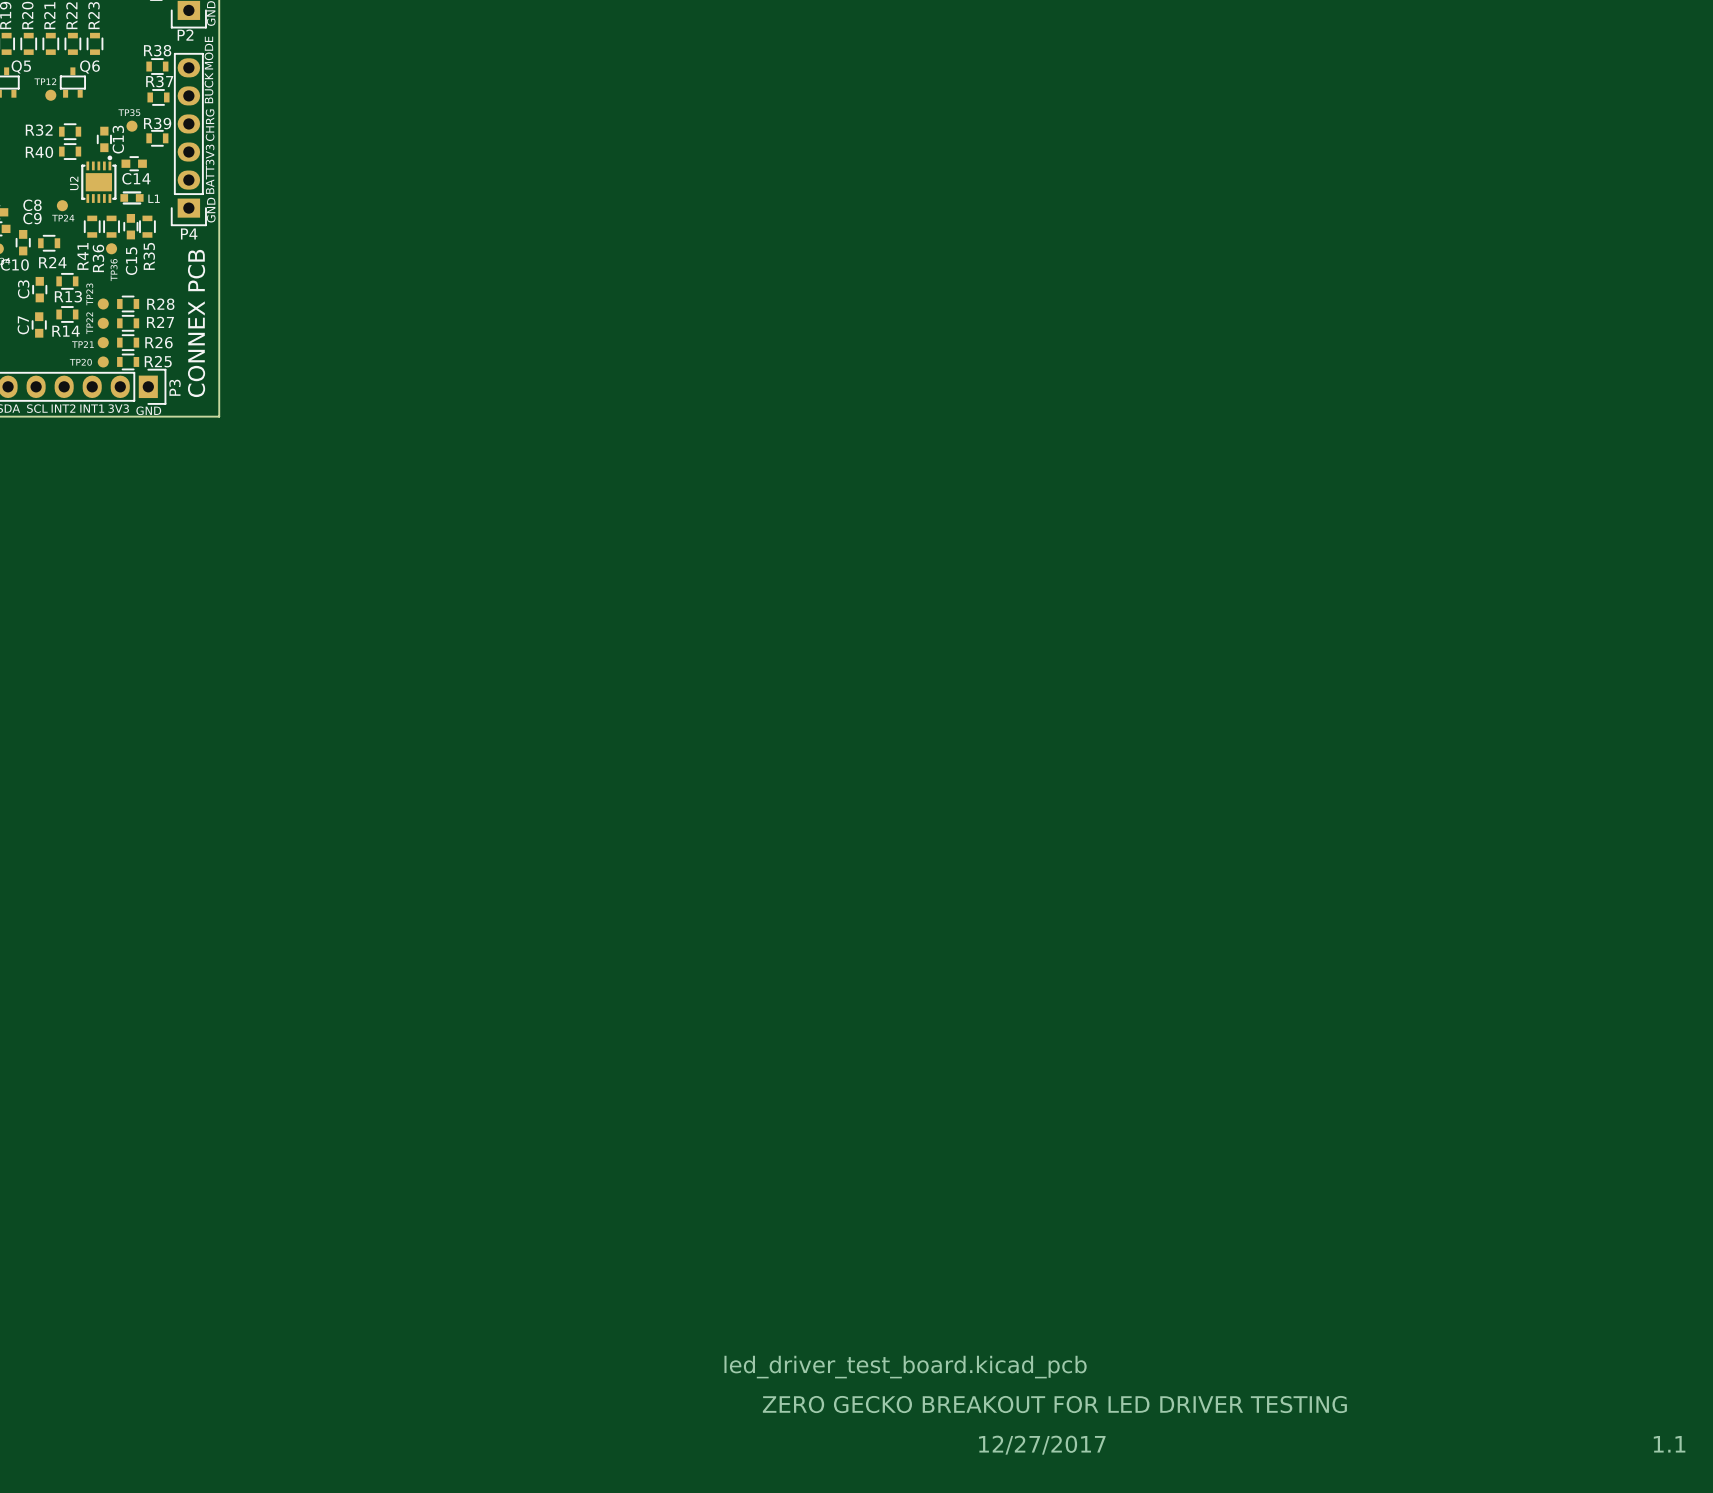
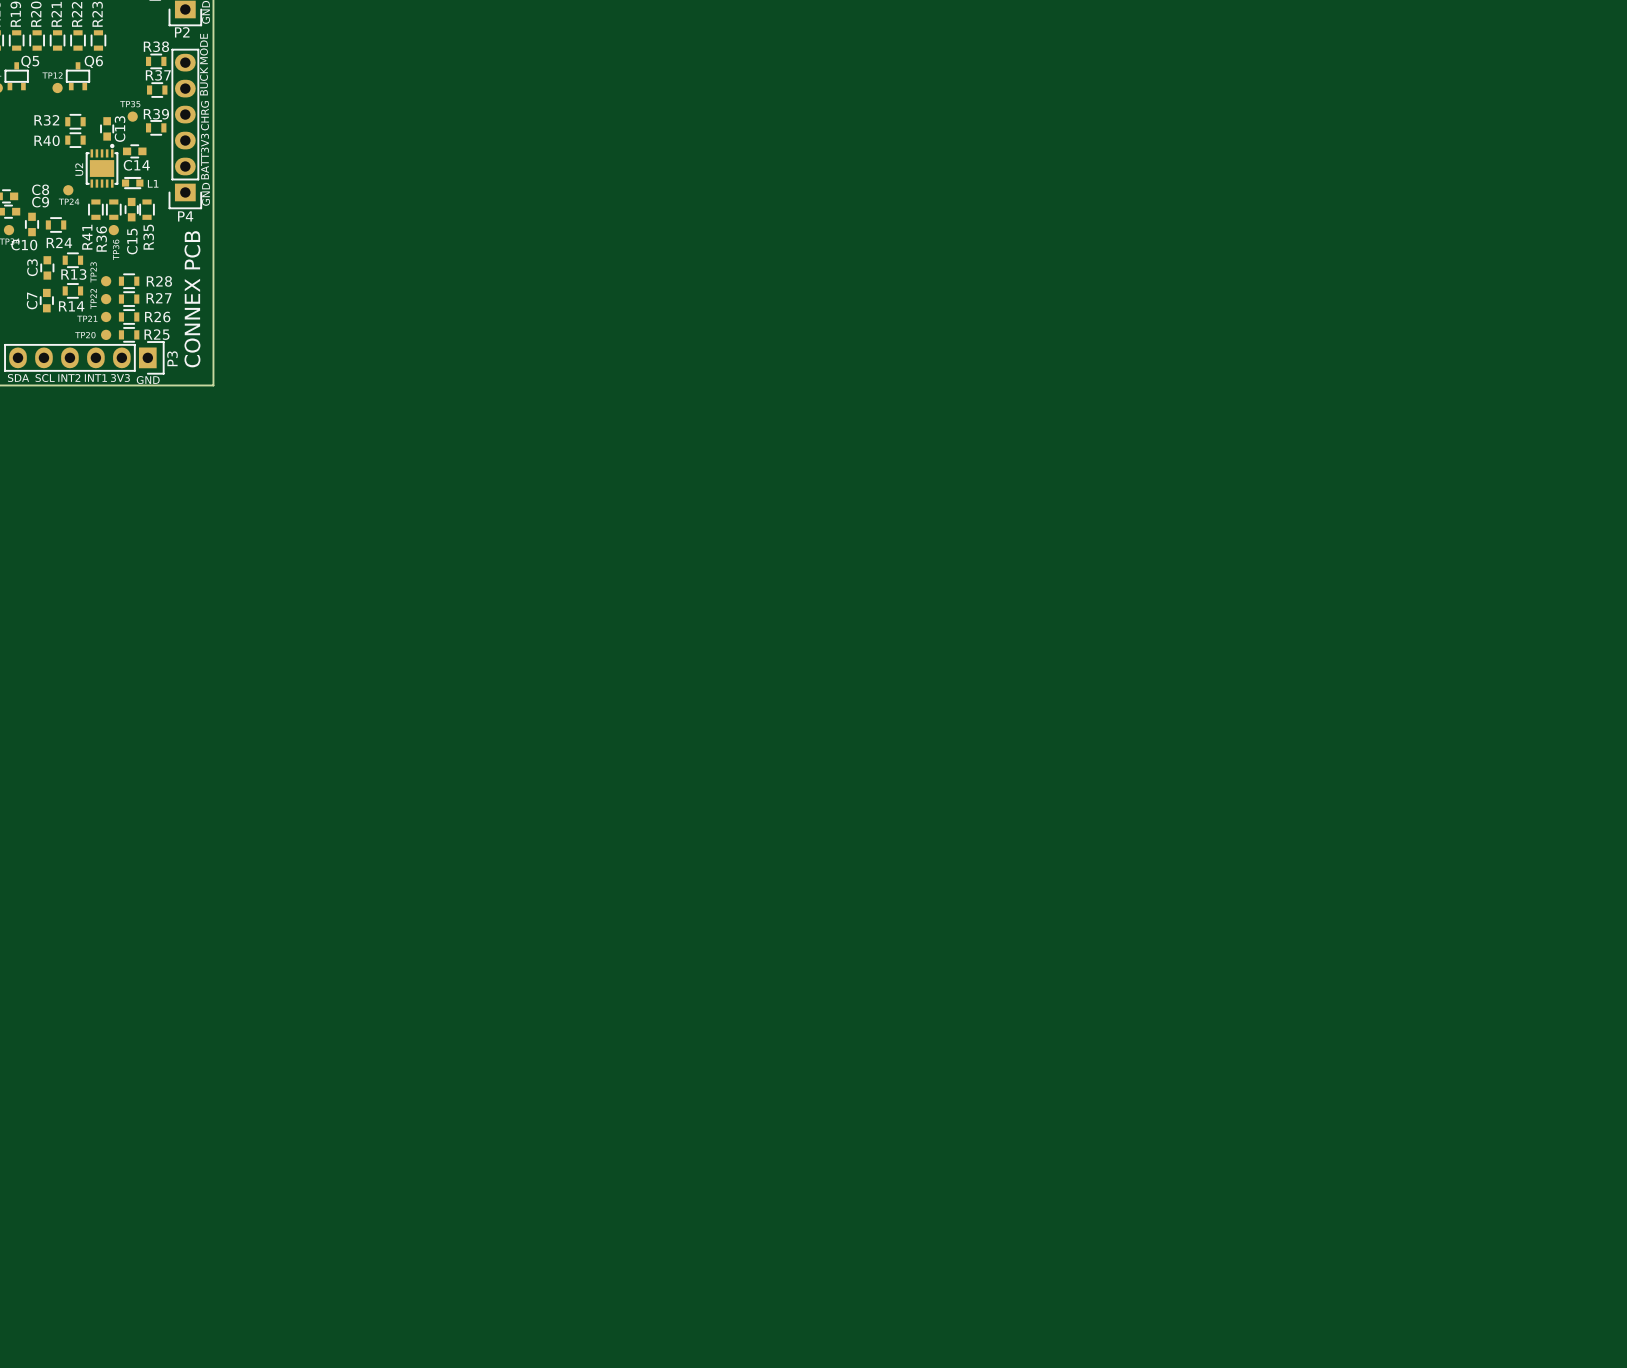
text: led_driver_test_board.kicad_pcb (905, 1367) -> none
text: ZERO GECKO BREAKOUT FOR LED DRIVER TESTING (1054, 1404) -> none
text: 1.1 (1669, 1444) -> none
text: 12/27/2017 (1042, 1445) -> none

